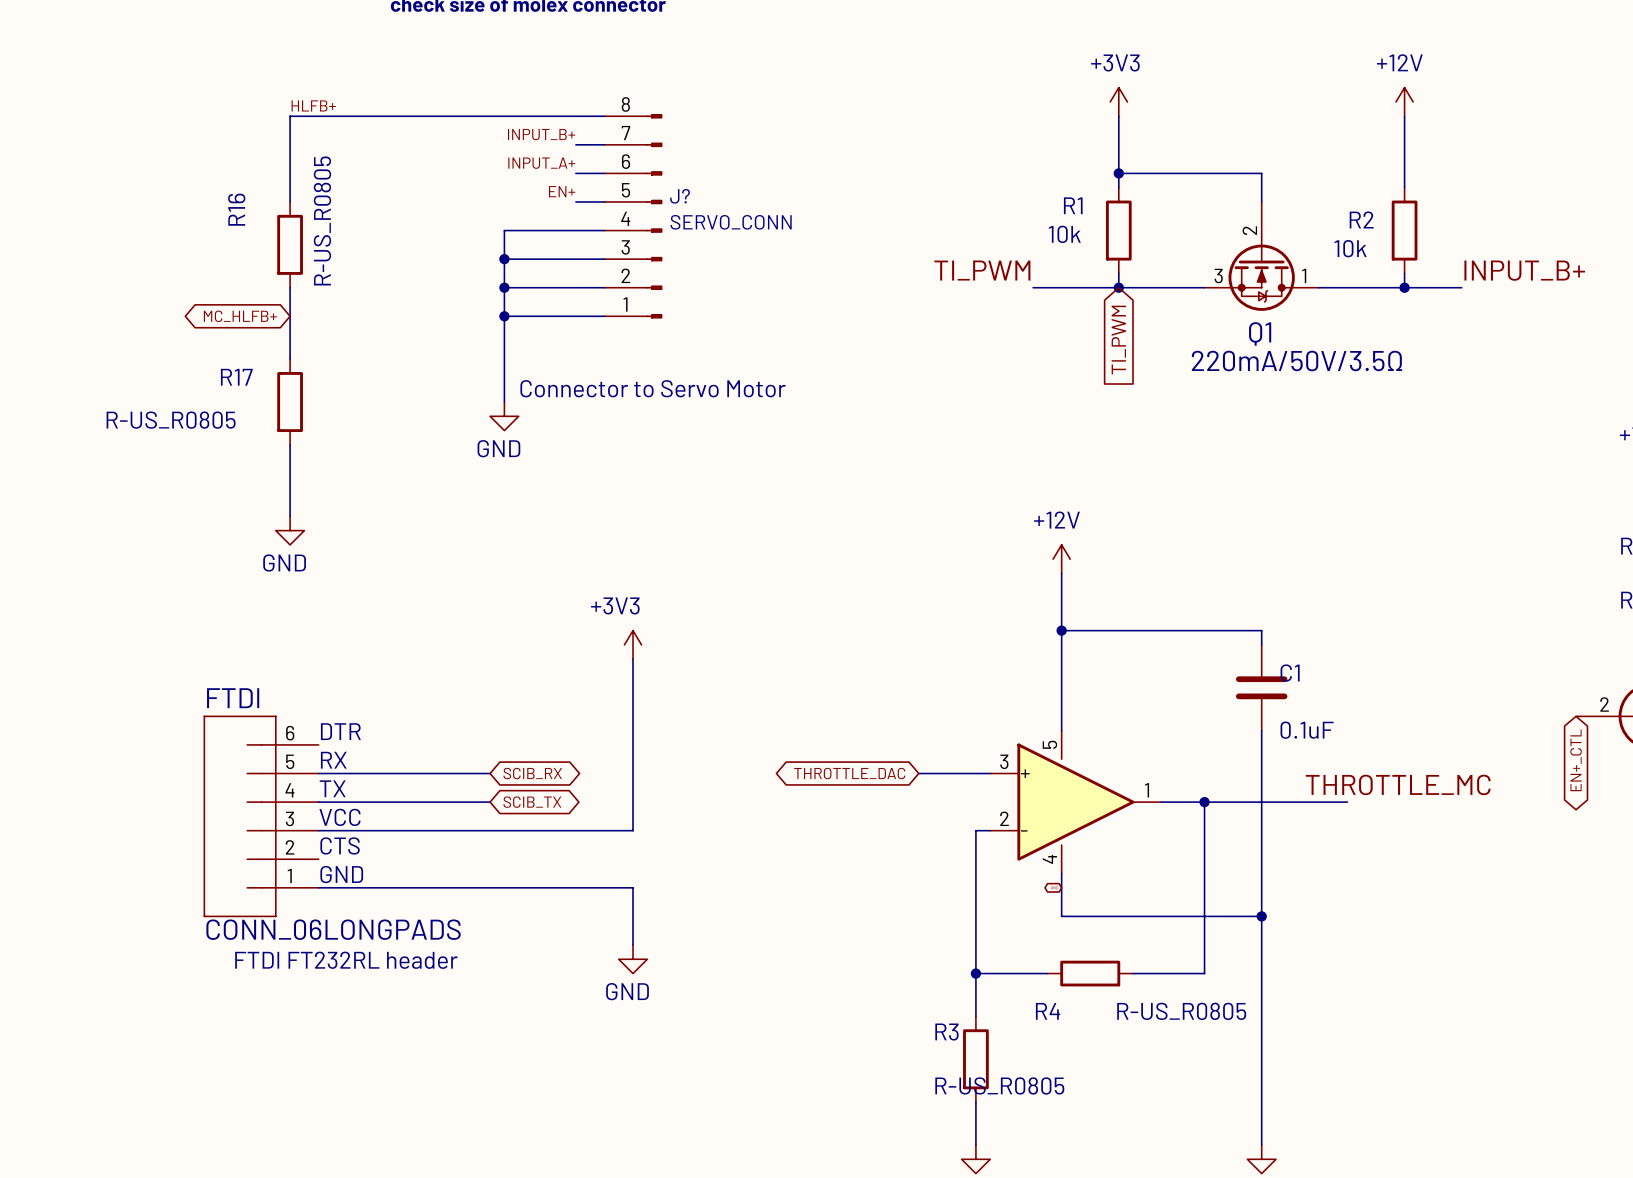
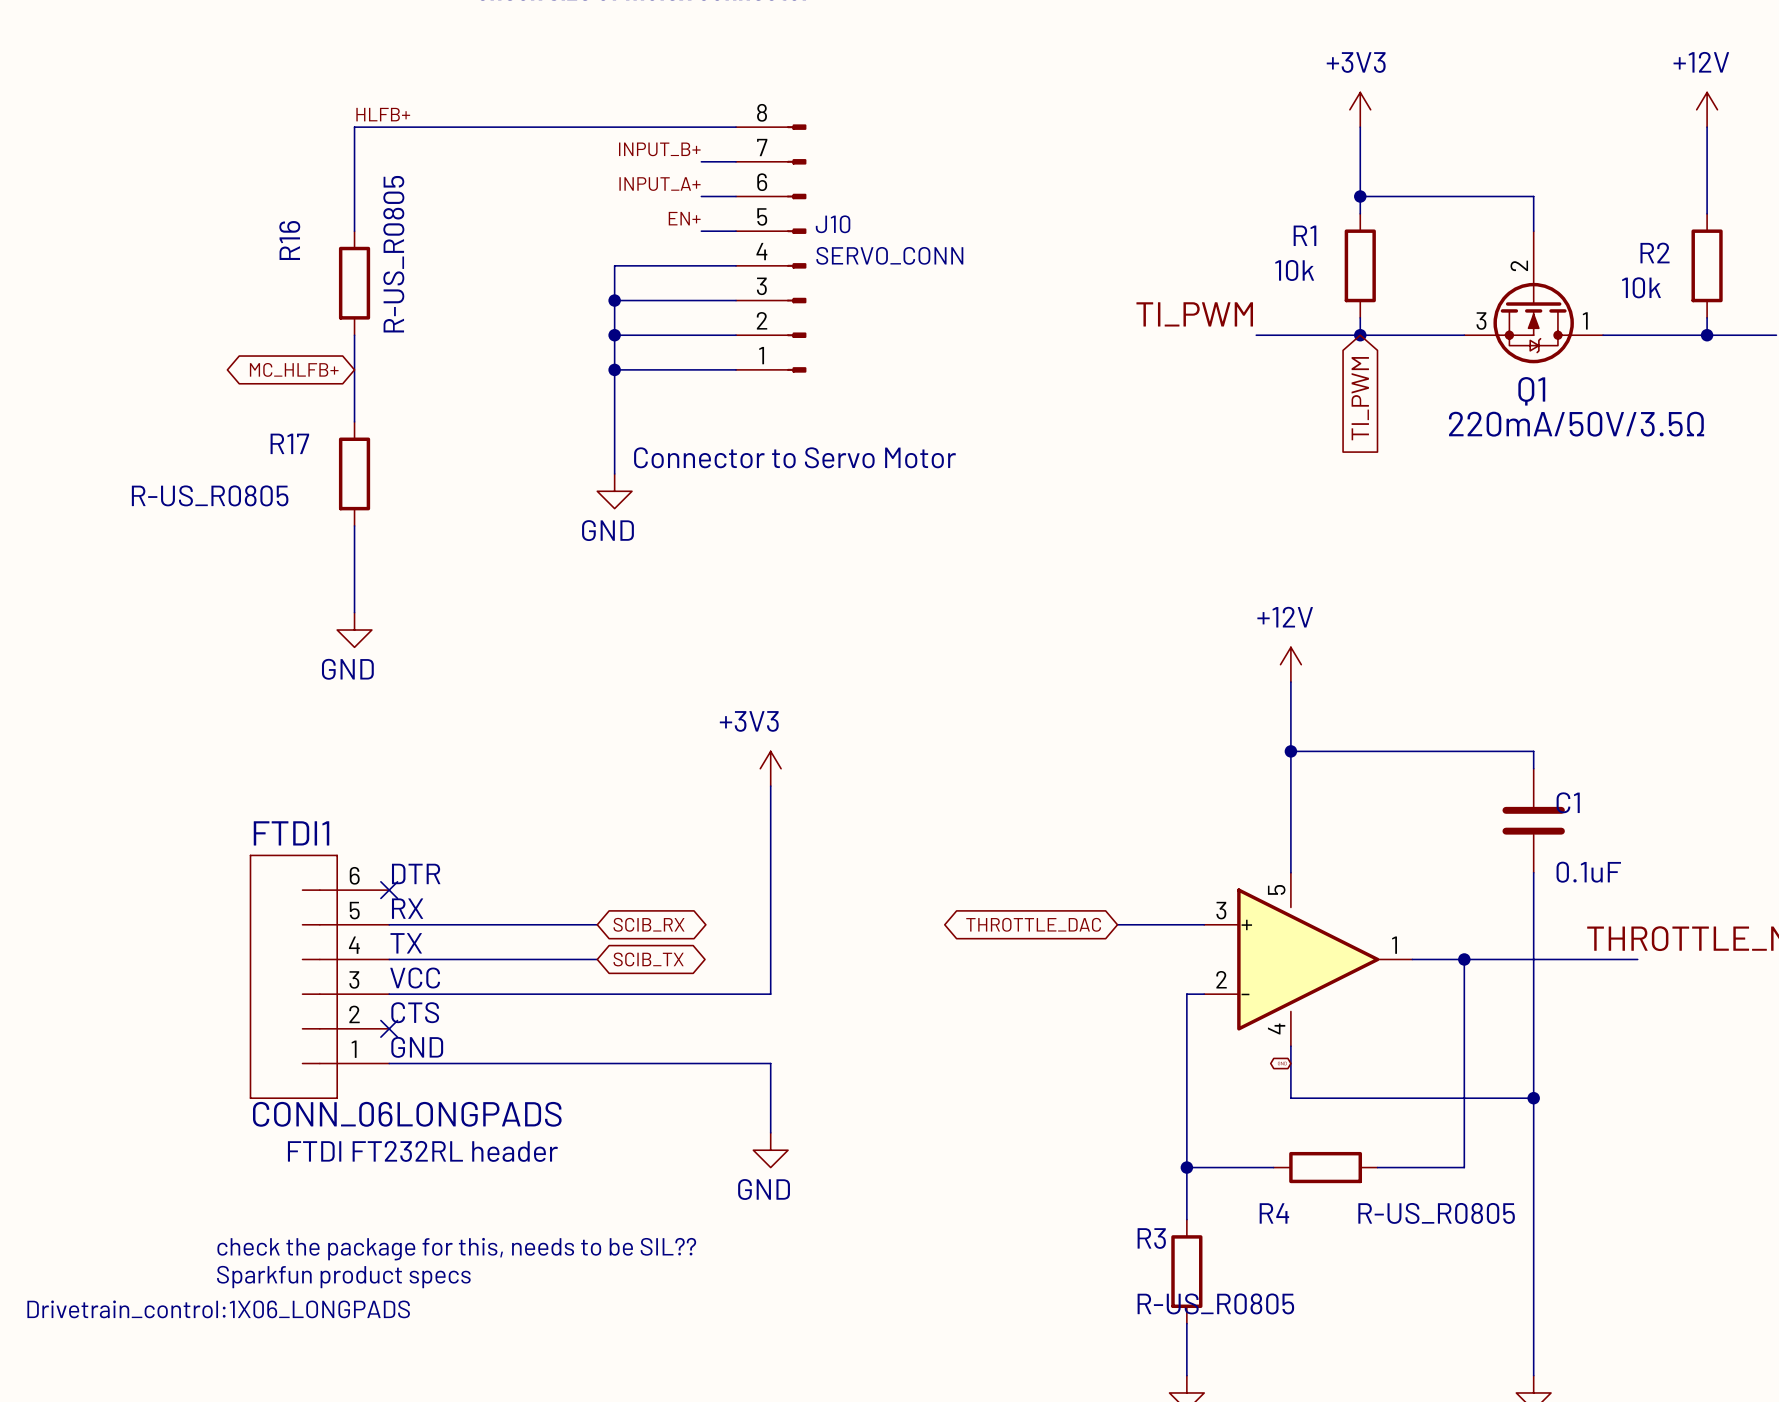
J? name: J? (680, 196) -> J10 (833, 224)
FTDI name: FTDI (233, 698) -> FTDI1 (291, 833)
no-connect mark: none -> (389, 890)
no-connect mark: none -> (389, 1028)
text: none -> check the package for this, needs to be SIL?? (456, 1249)
text: none -> Sparkfun product specs (343, 1277)
text: none -> Drivetrain_control:1X06_LONGPADS (218, 1309)

